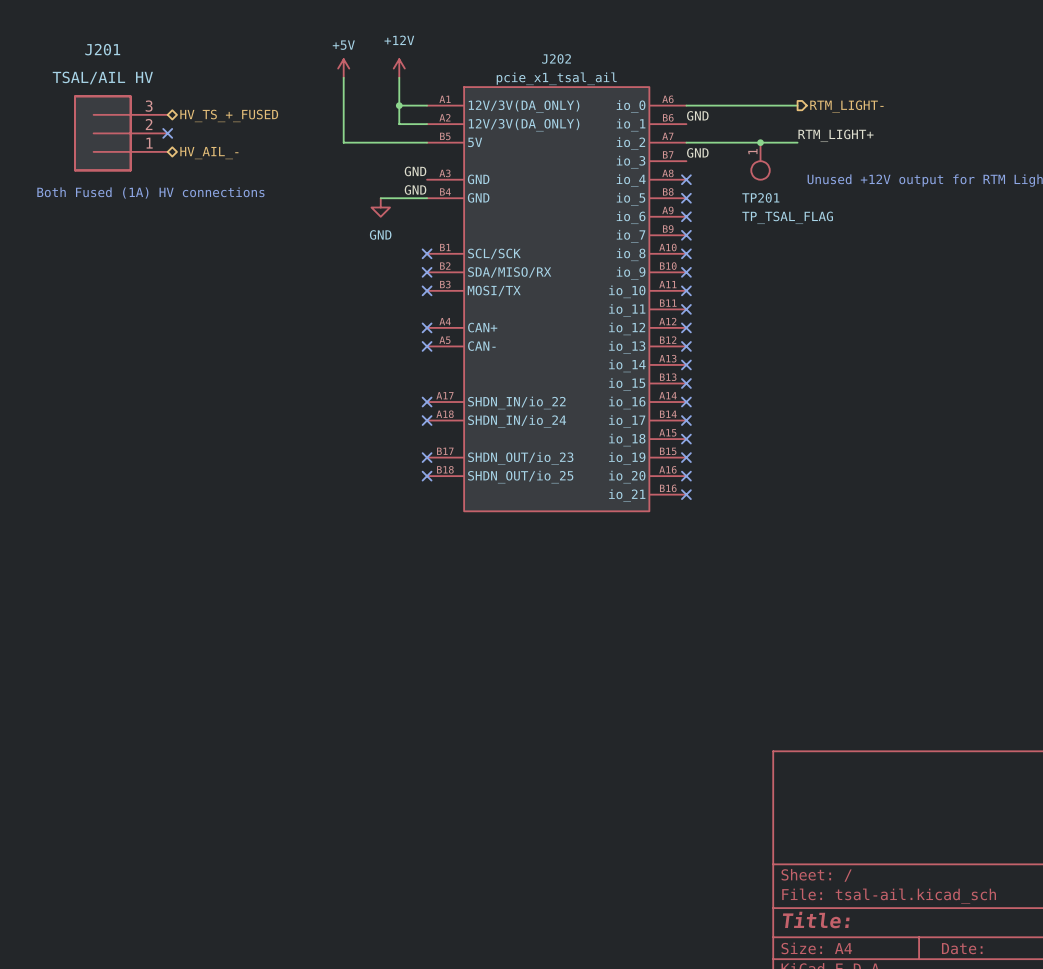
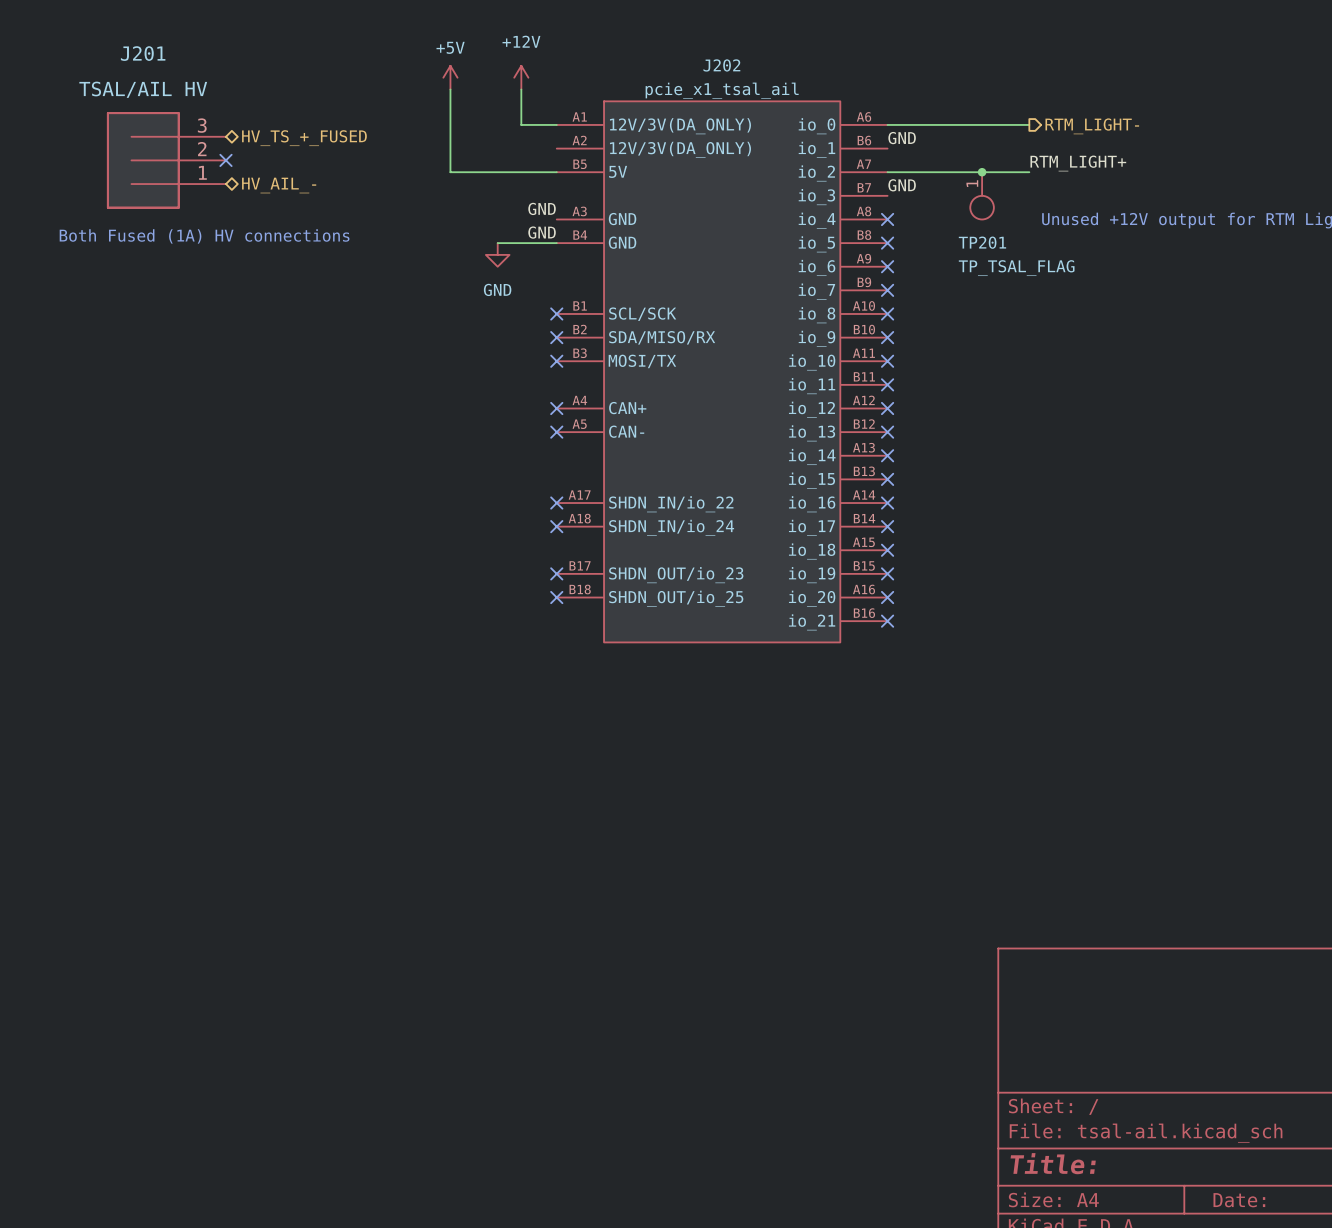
wire: (399, 105) (399, 124) (427, 124) -> none
junction: (399, 105) -> none

